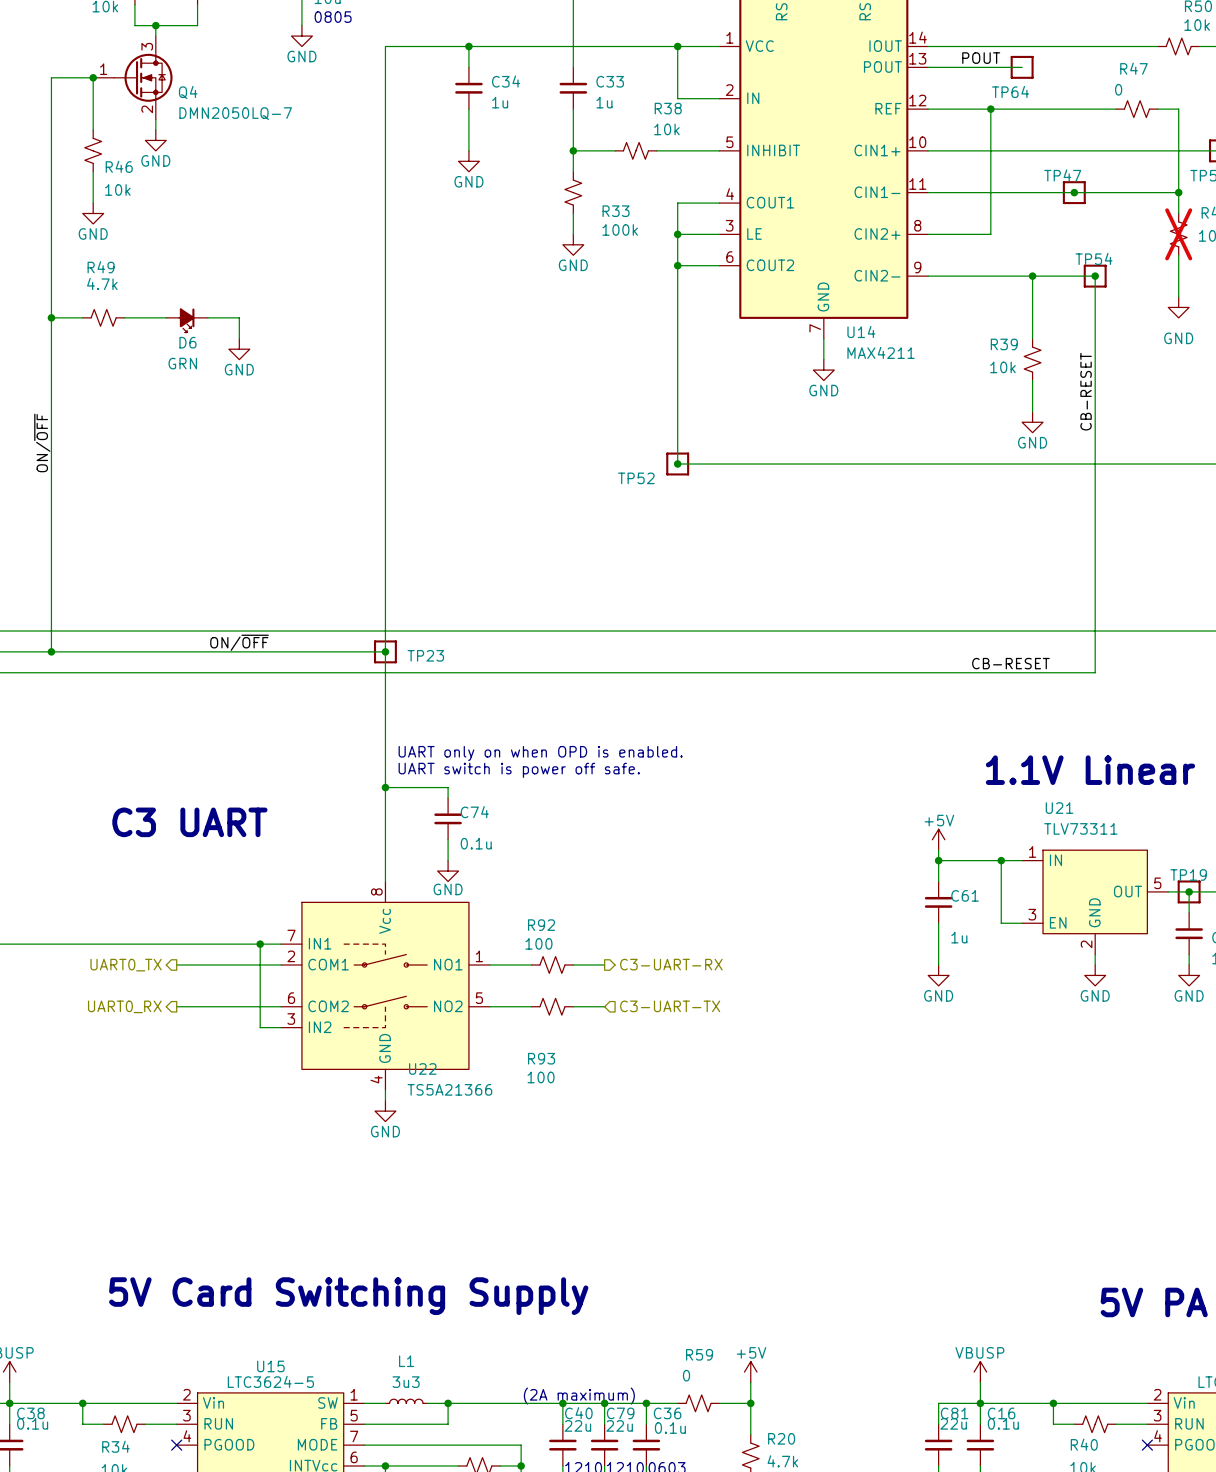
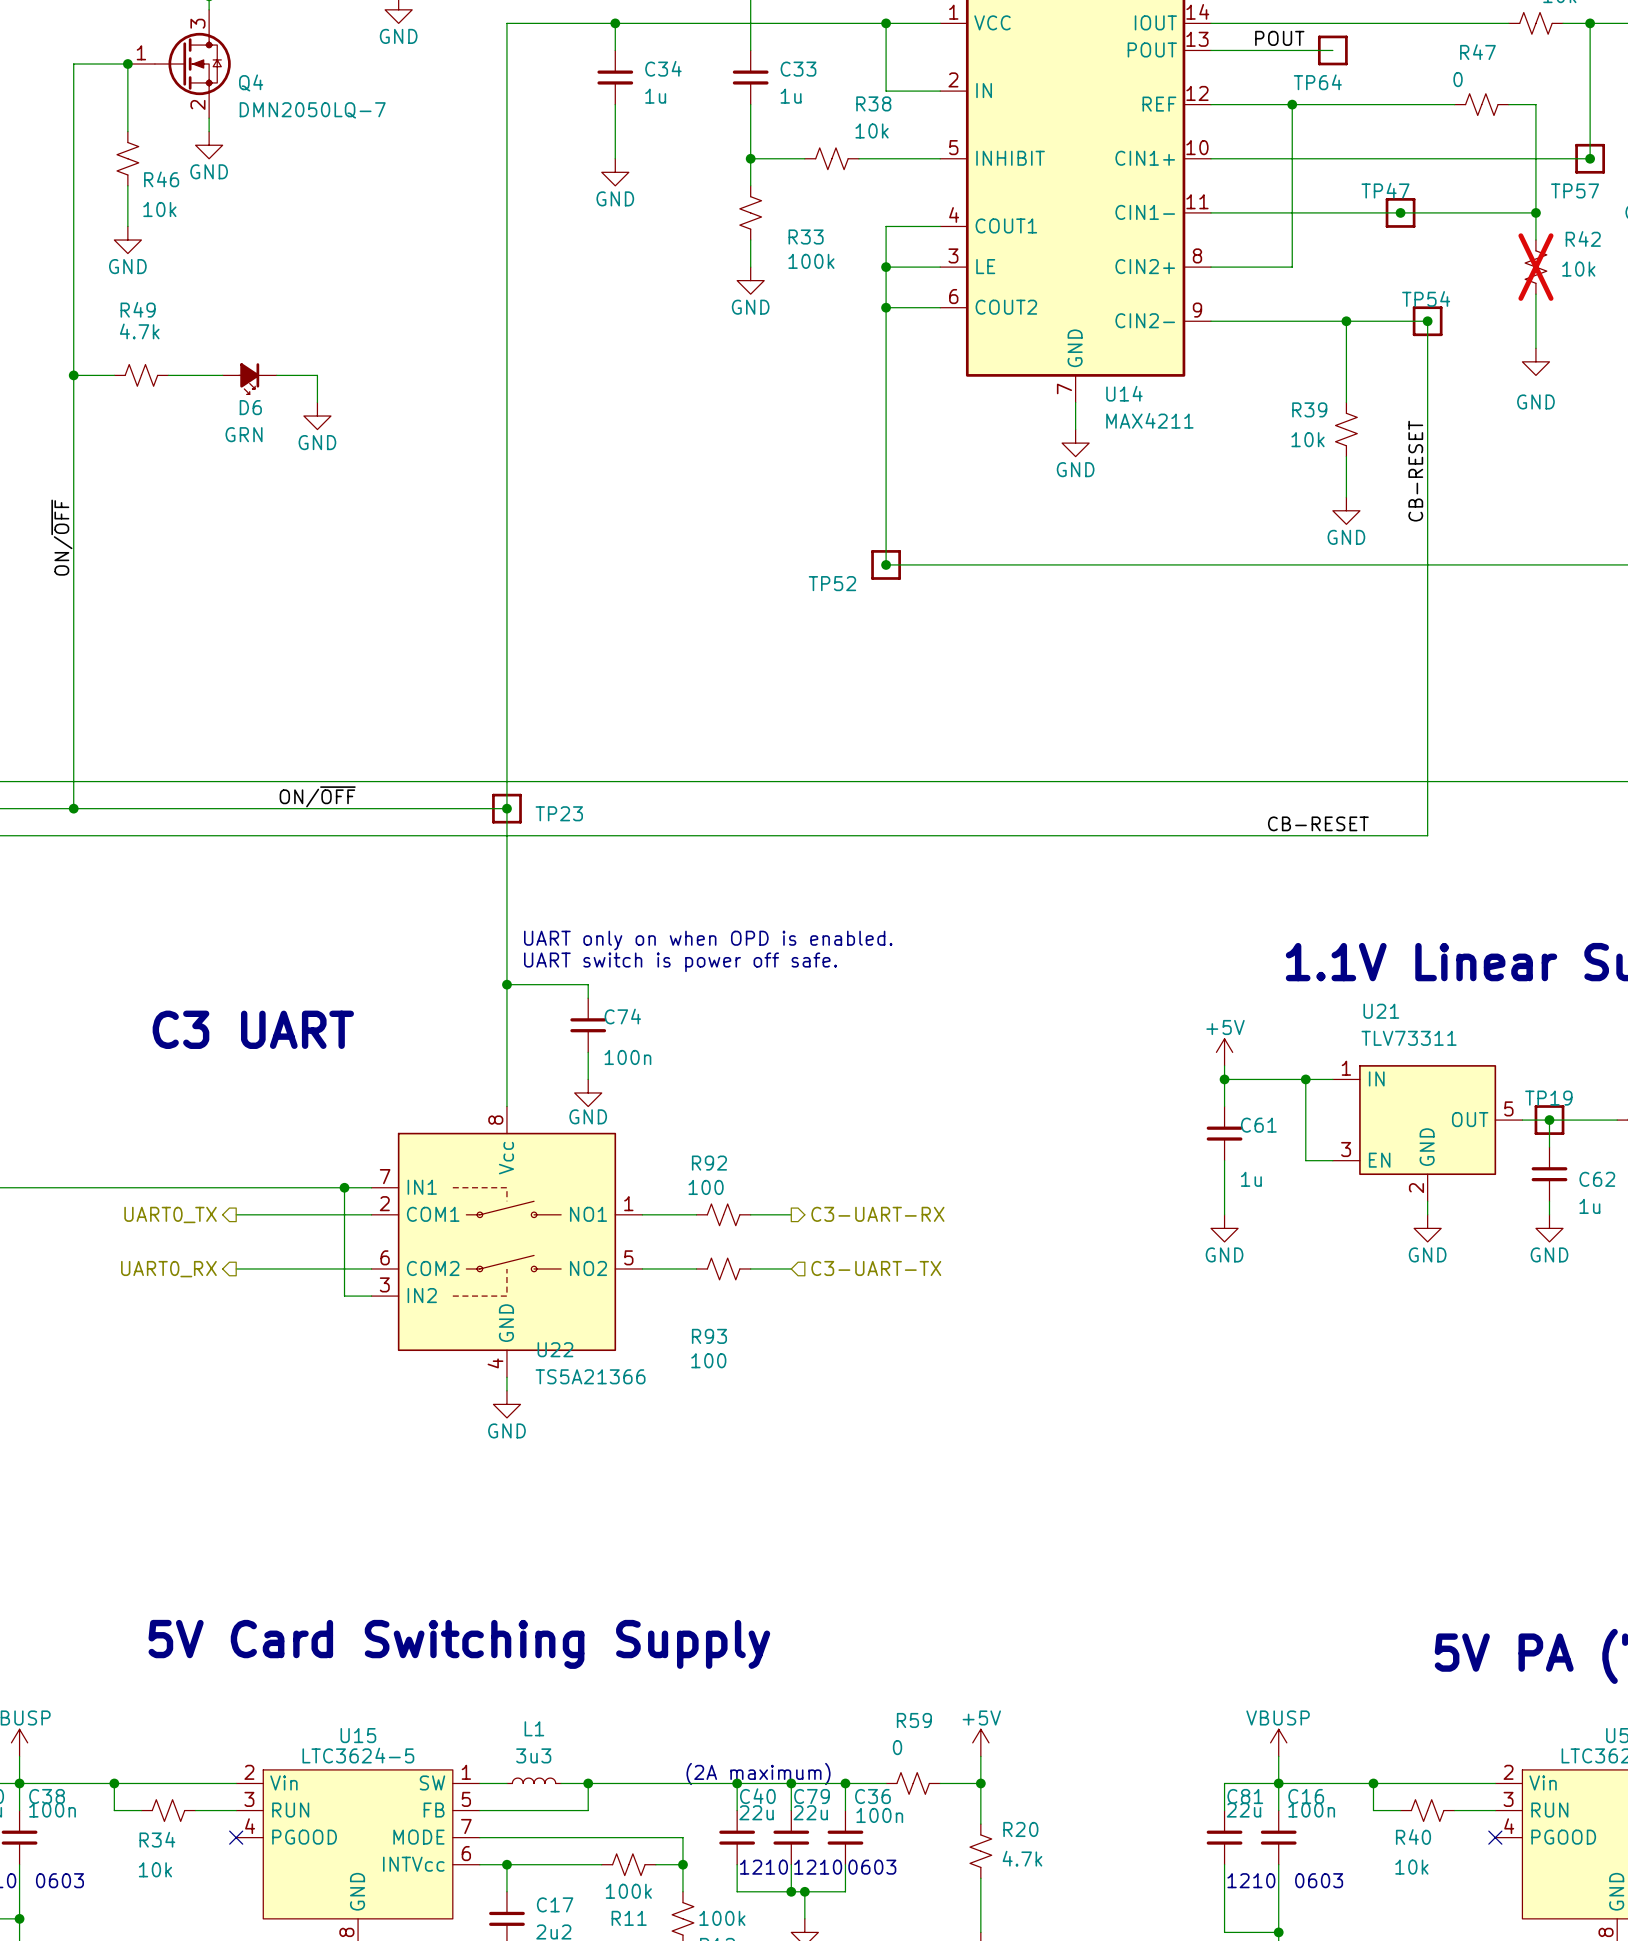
C74 value: 0.1u (476, 843) -> 100n (627, 1057)
C38 value: 0.1u (32, 1423) -> 100n (52, 1810)
C16 value: 0.1u (1003, 1423) -> 100n (1311, 1810)
C36 value: 0.1u (670, 1428) -> 100n (879, 1815)

